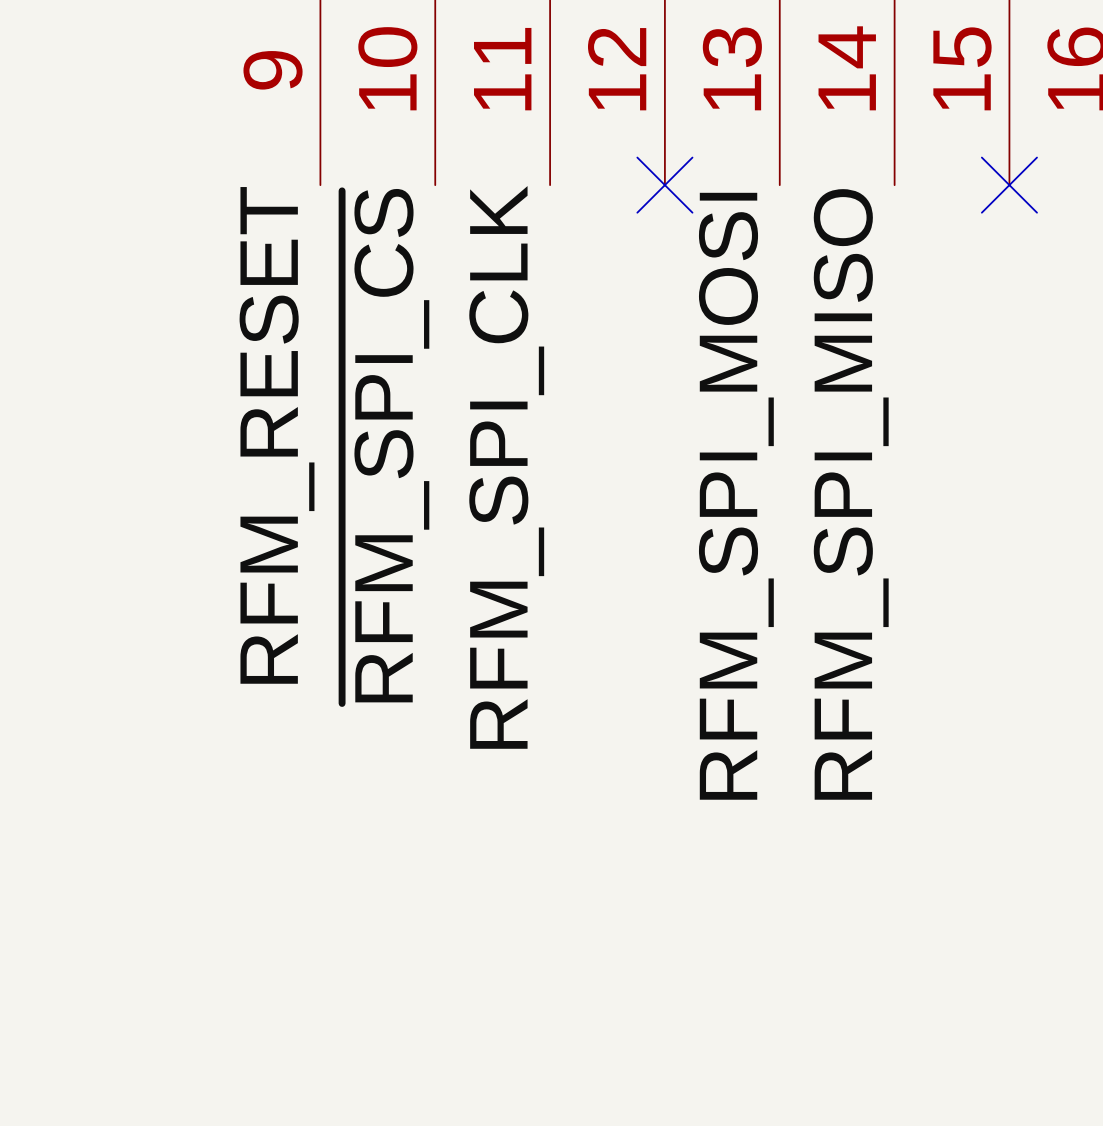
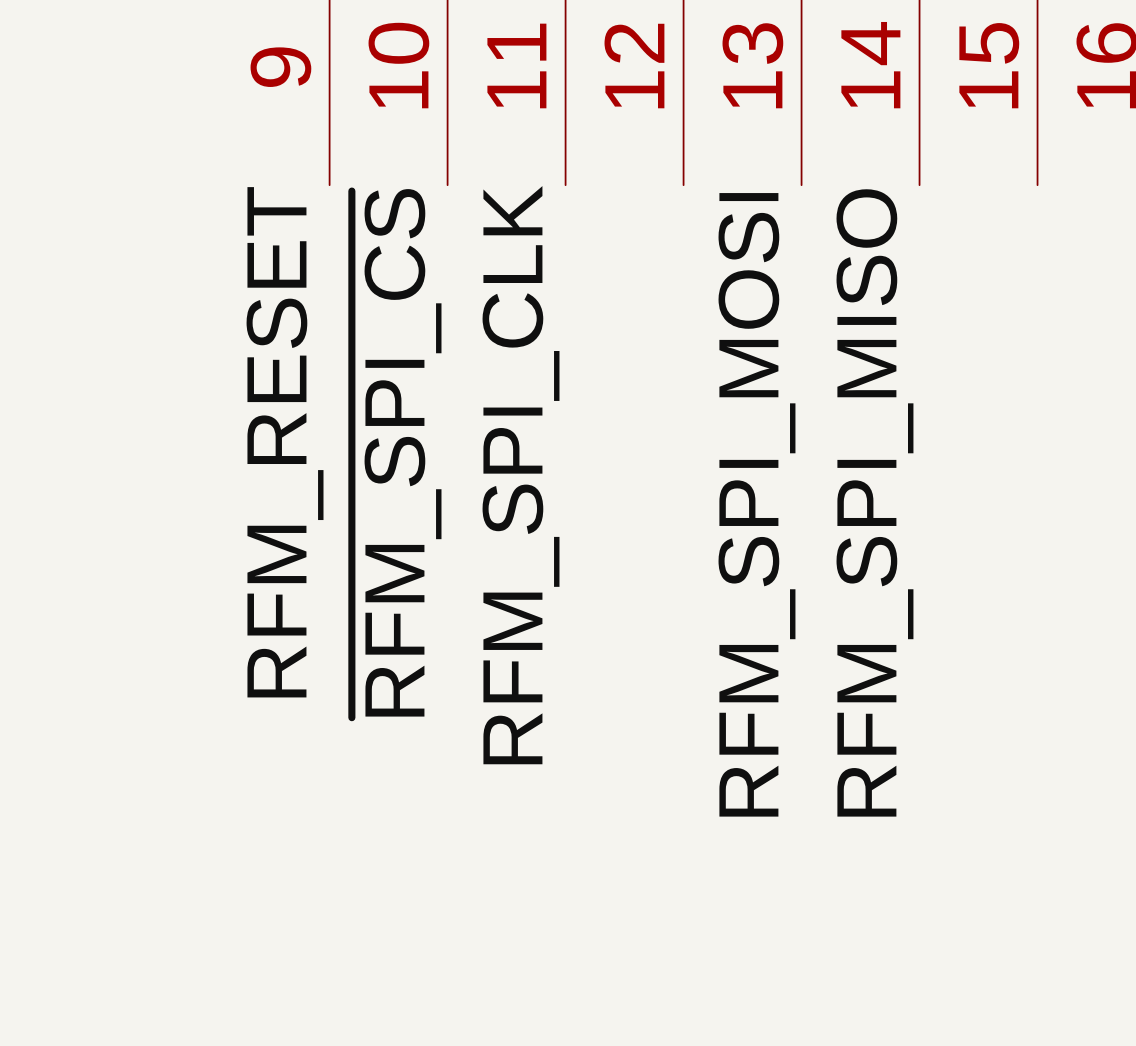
no-connect mark: (664, 185) -> none
no-connect mark: (1009, 185) -> none

